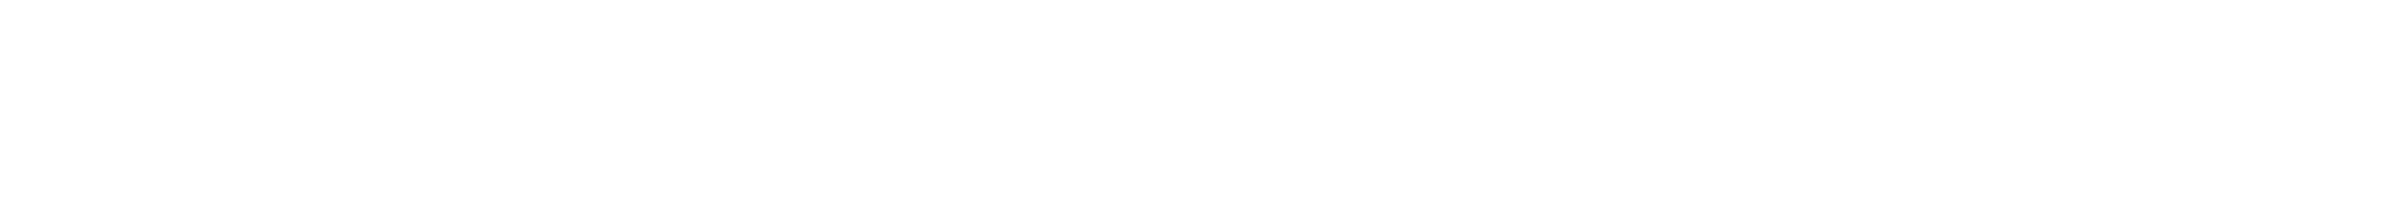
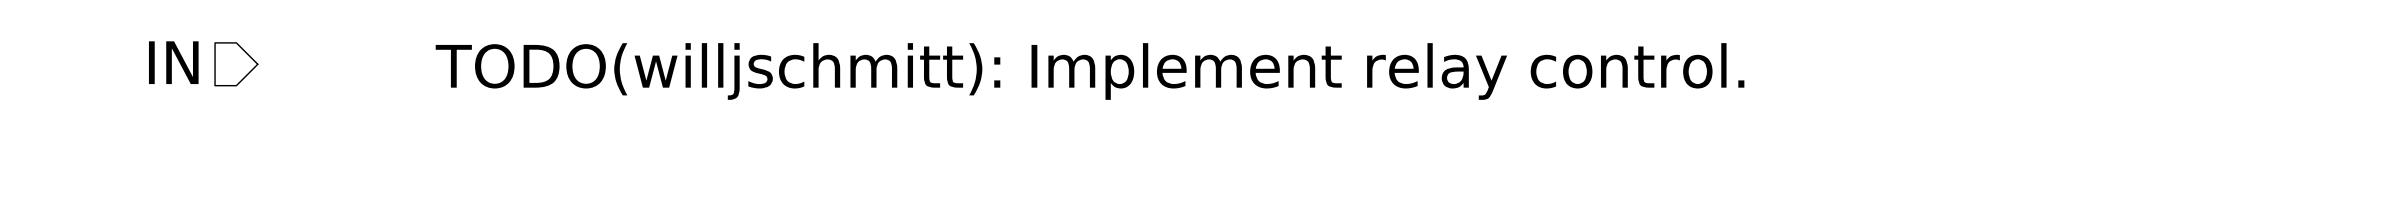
hierarchical label: none -> IN (173, 62)
text: none -> TODO(willjschmitt): Implement relay control. (1090, 71)

